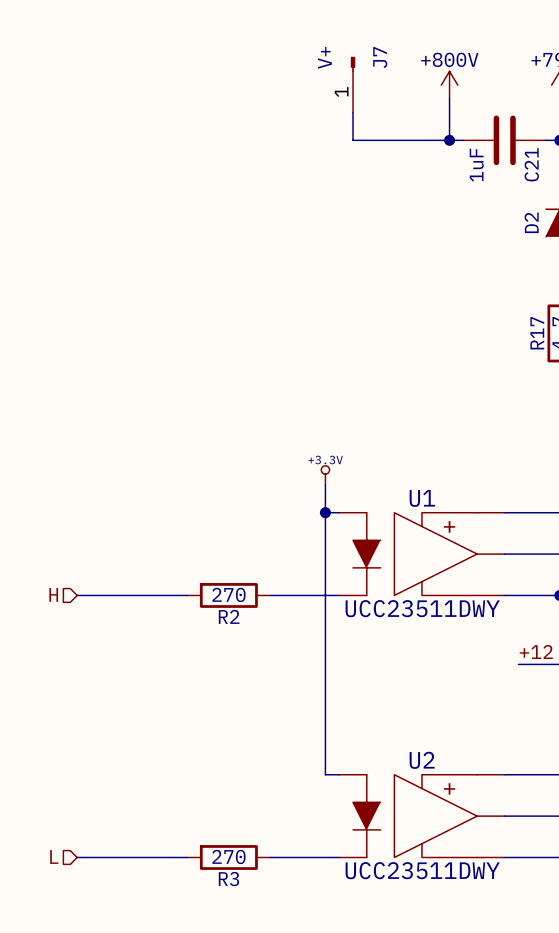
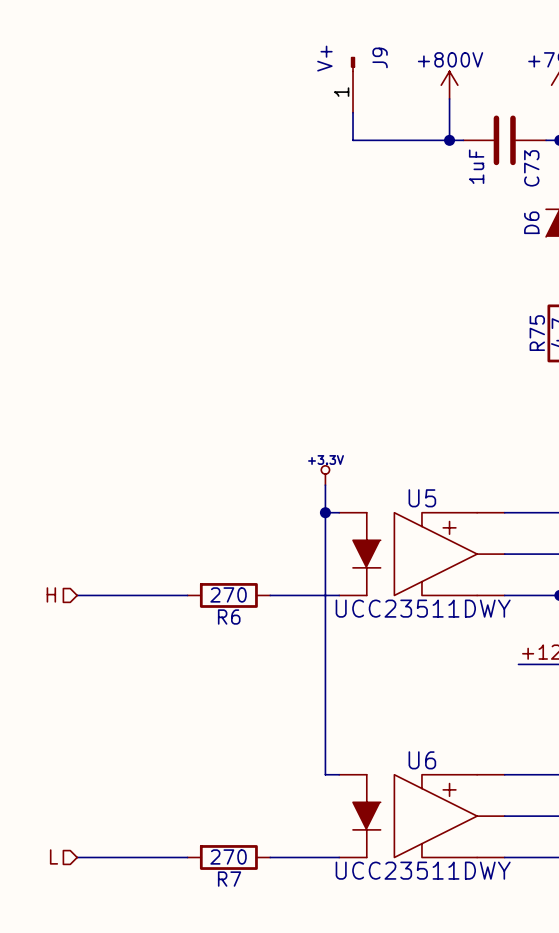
J7 name: J7 (380, 57) -> J9 (380, 57)
C21 name: C21 (531, 164) -> C73 (531, 168)
D2 name: D2 (531, 222) -> D6 (531, 222)
R17 name: R17 (537, 333) -> R75 (537, 333)
U1 name: U1 (422, 498) -> U5 (422, 498)
R2 name: R2 (229, 616) -> R6 (229, 617)
U2 name: U2 (422, 760) -> U6 (422, 760)
R3 name: R3 (228, 879) -> R7 (229, 879)

